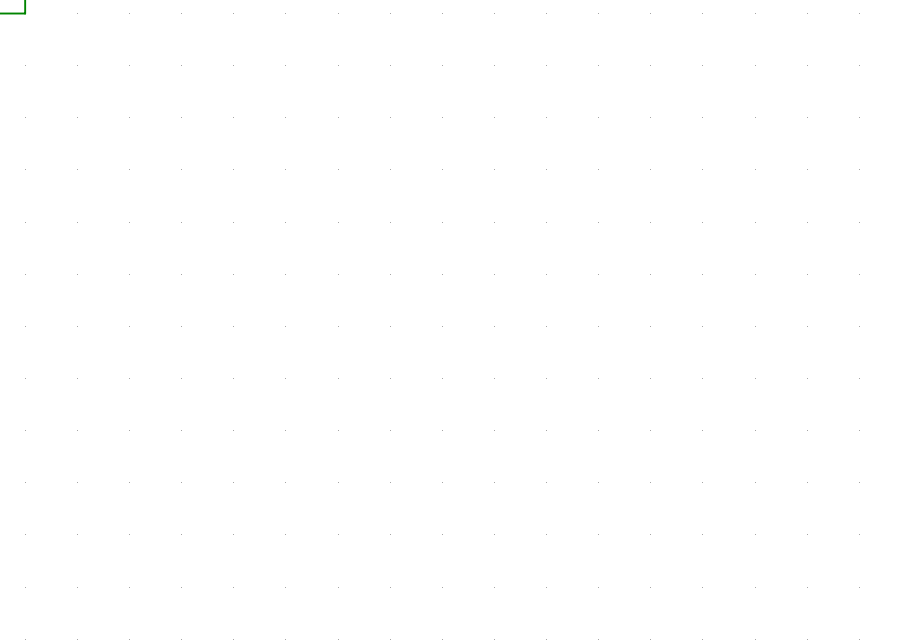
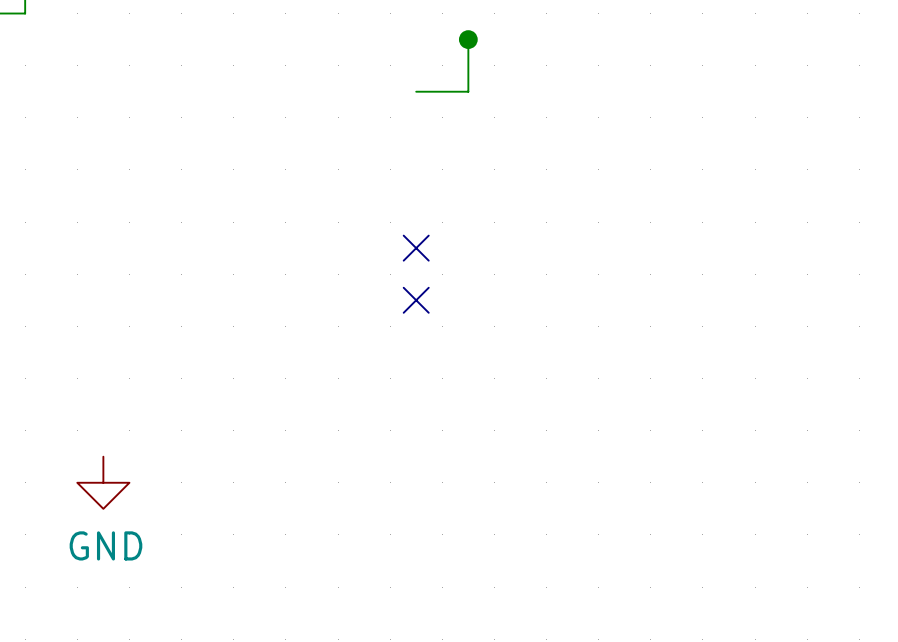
wire: none -> (468, 39) (468, 91) (416, 91)
junction: none -> (468, 39)
no-connect mark: none -> (416, 248)
no-connect mark: none -> (416, 300)
power symbol: none -> GND (103, 482)

